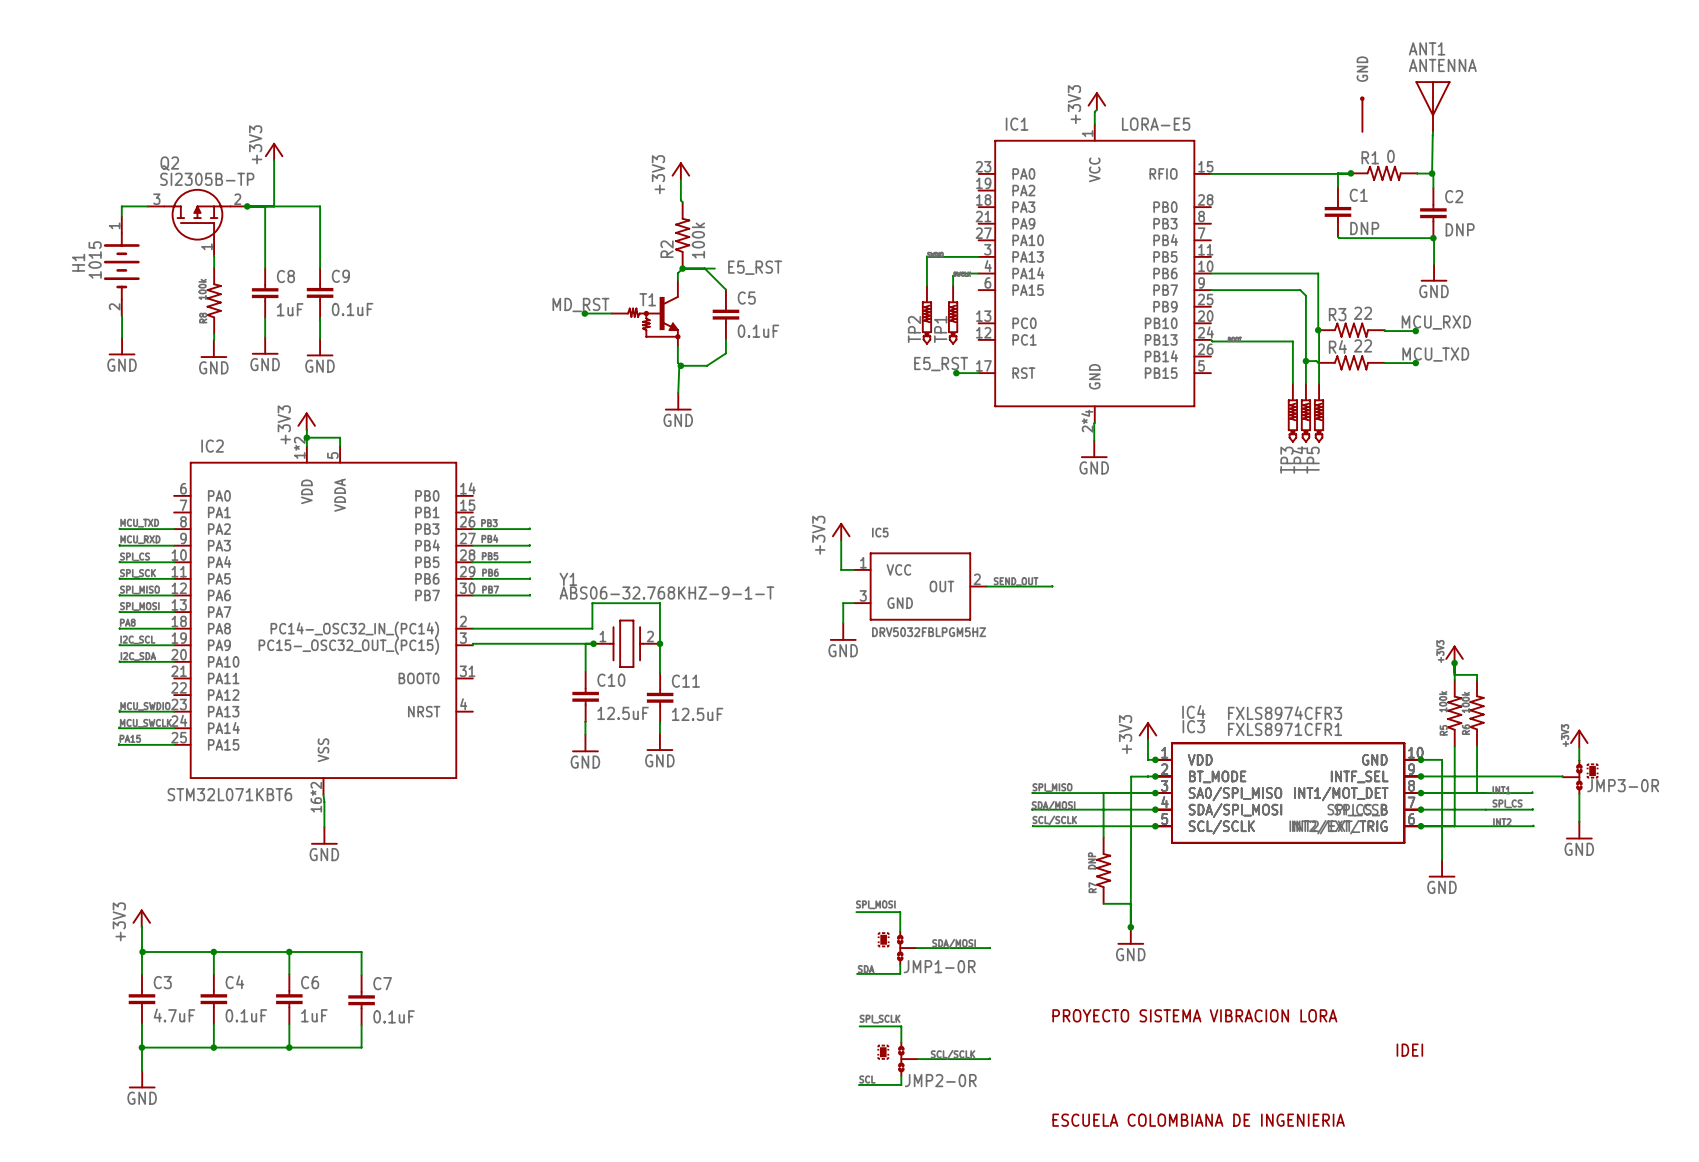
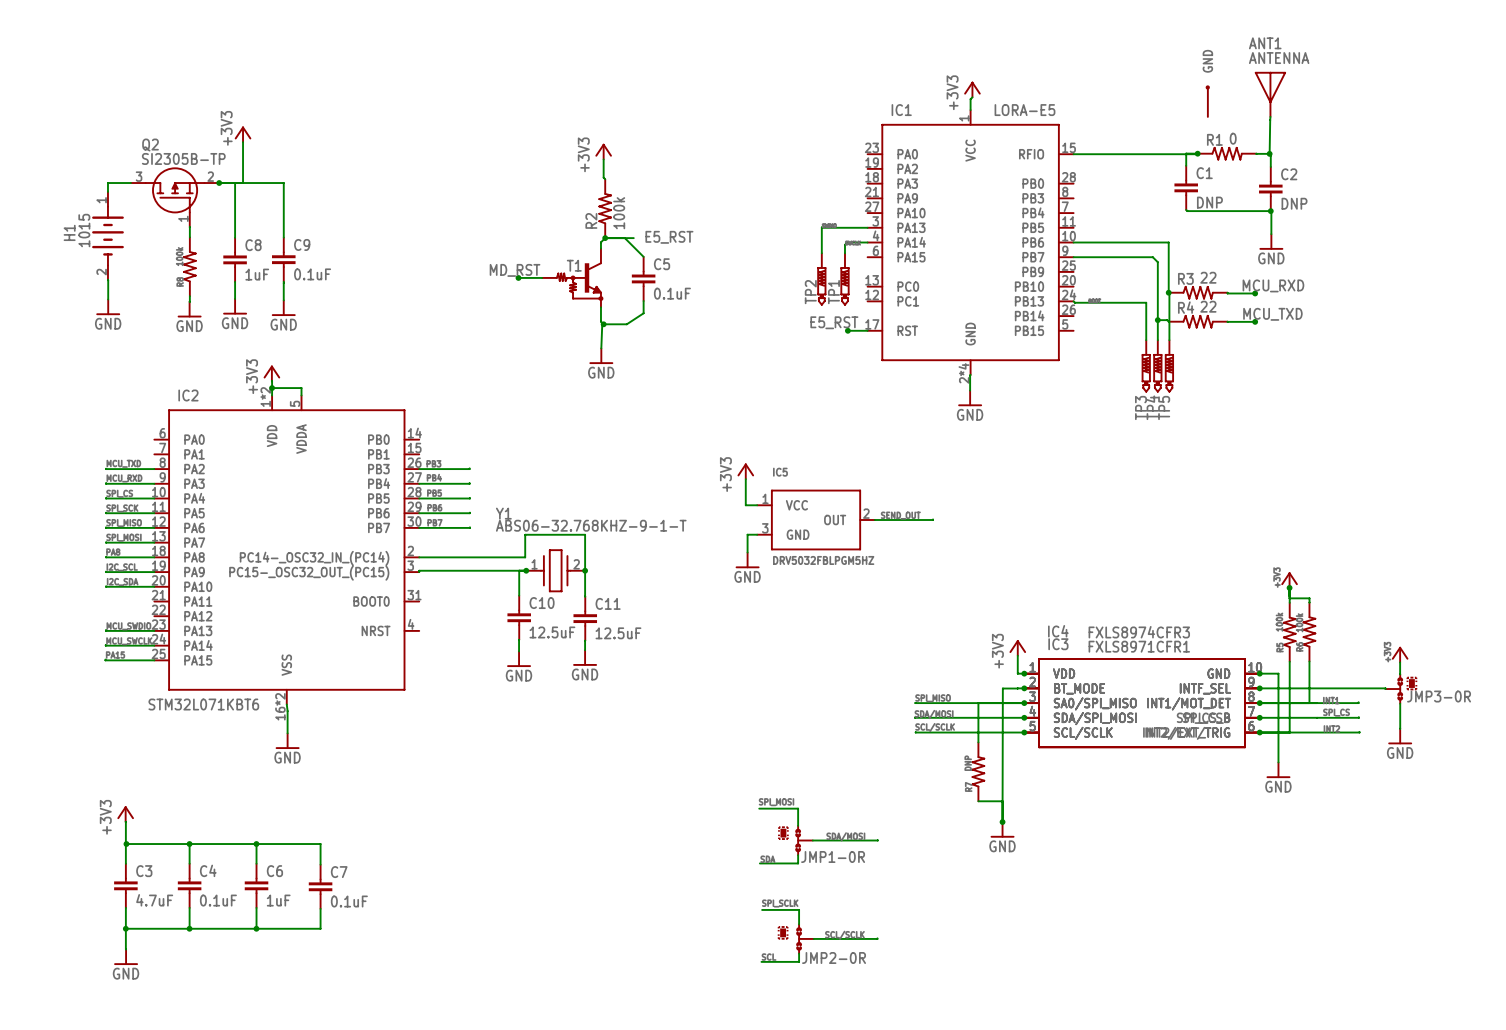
text: PROYECTO SISTEMA VIBRACION LORA (1194, 1015) -> none
text: IDEI (1409, 1050) -> none
text: ESCUELA COLOMBIANA DE INGENIERIA (1198, 1120) -> none

